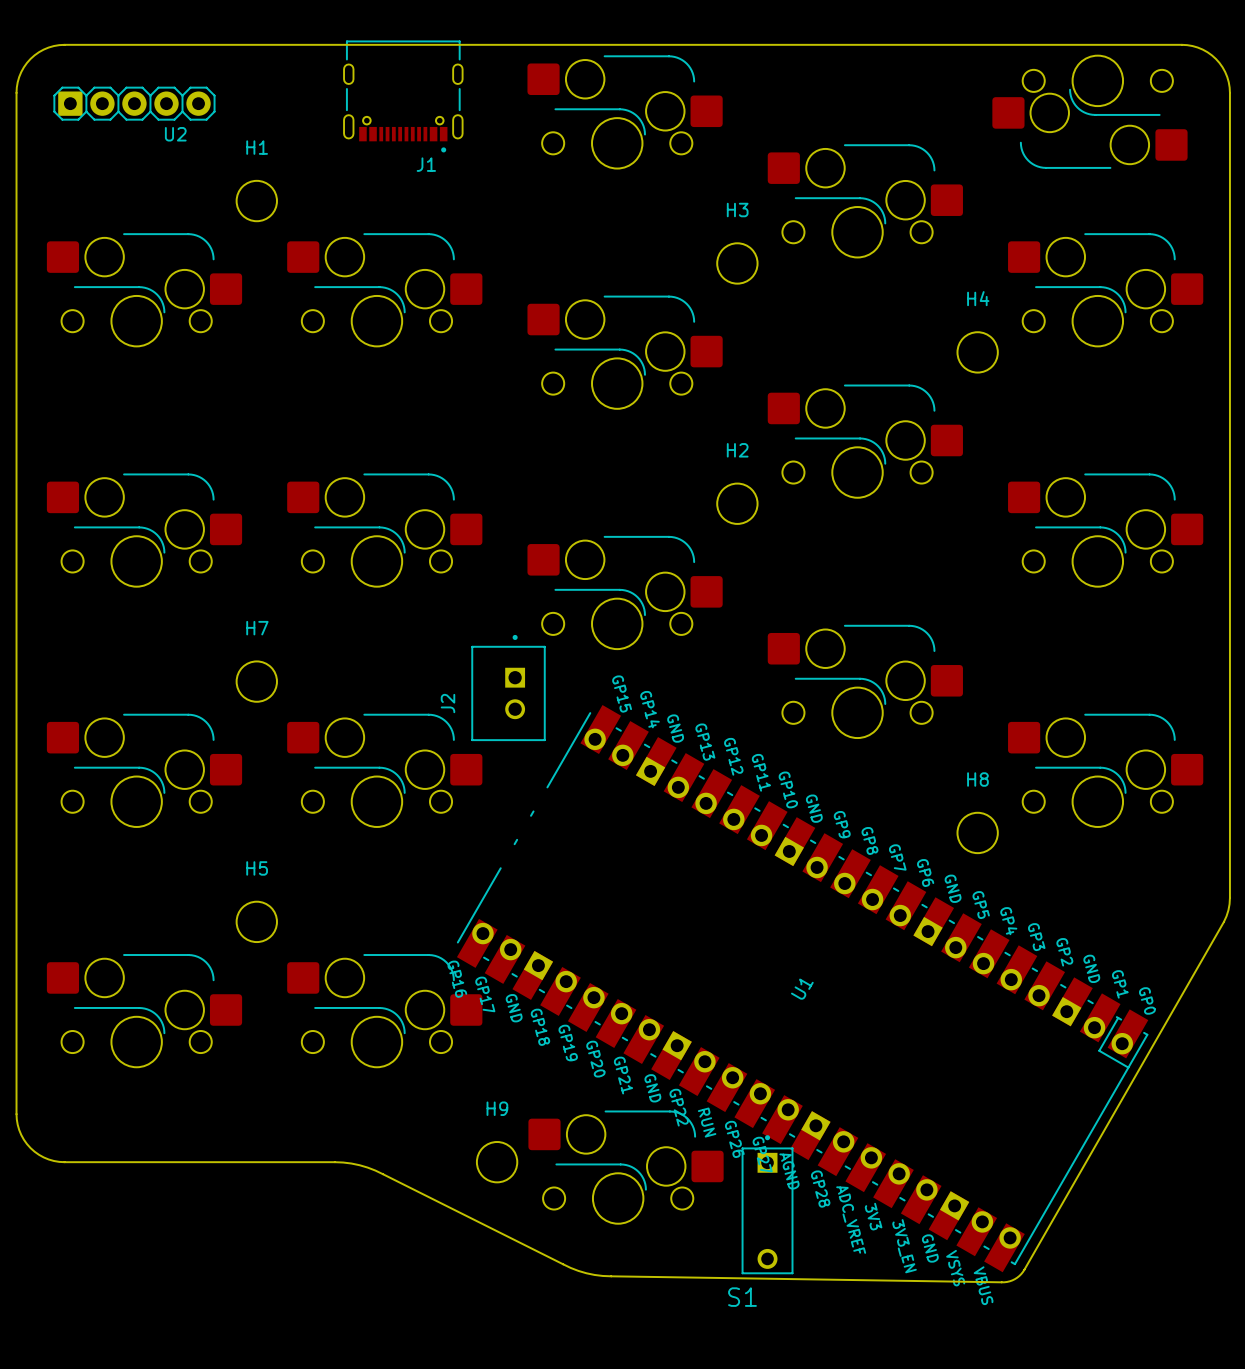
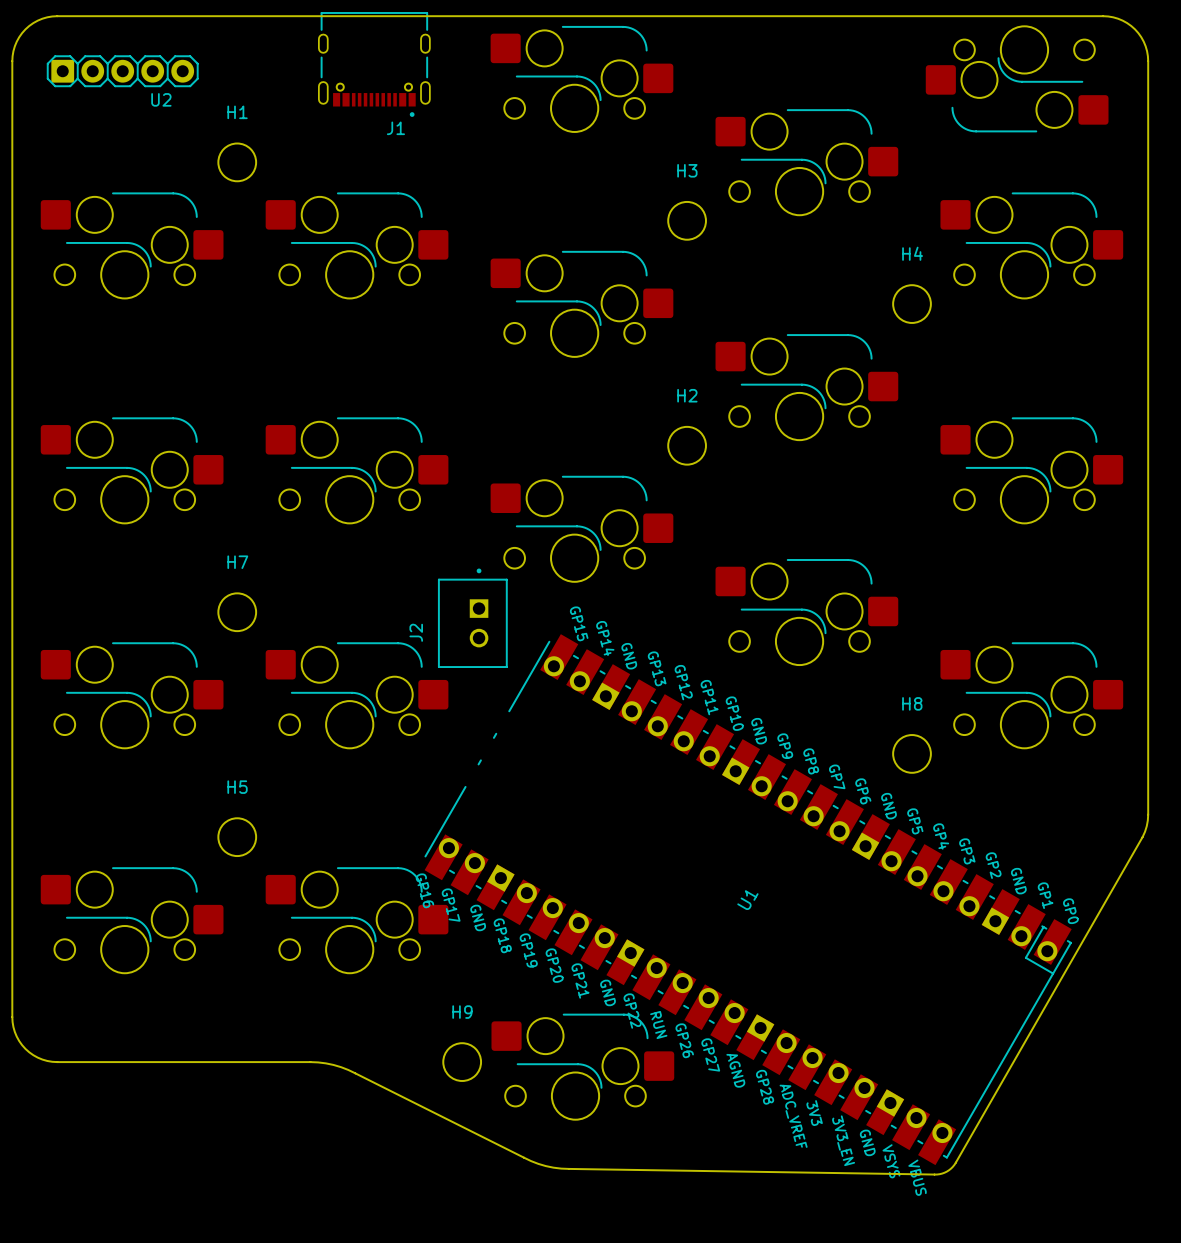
S1: (767, 1204) -> none

